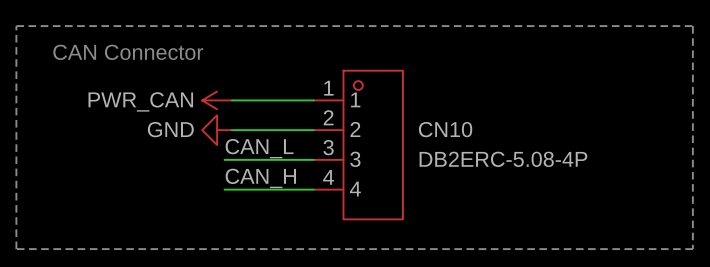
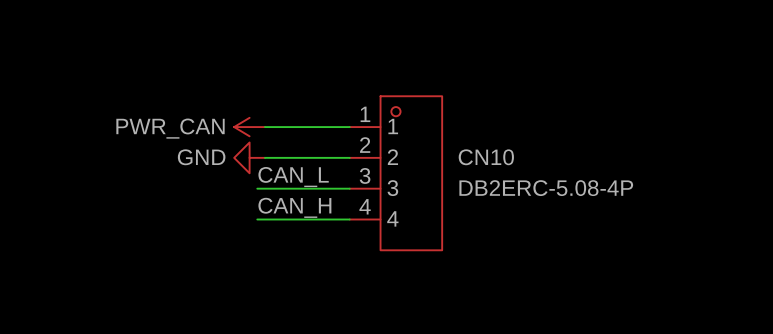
line: (16, 26) (692, 26) (692, 249) (16, 249) (16, 26) -> none
text: CAN Connector (128, 52) -> none

